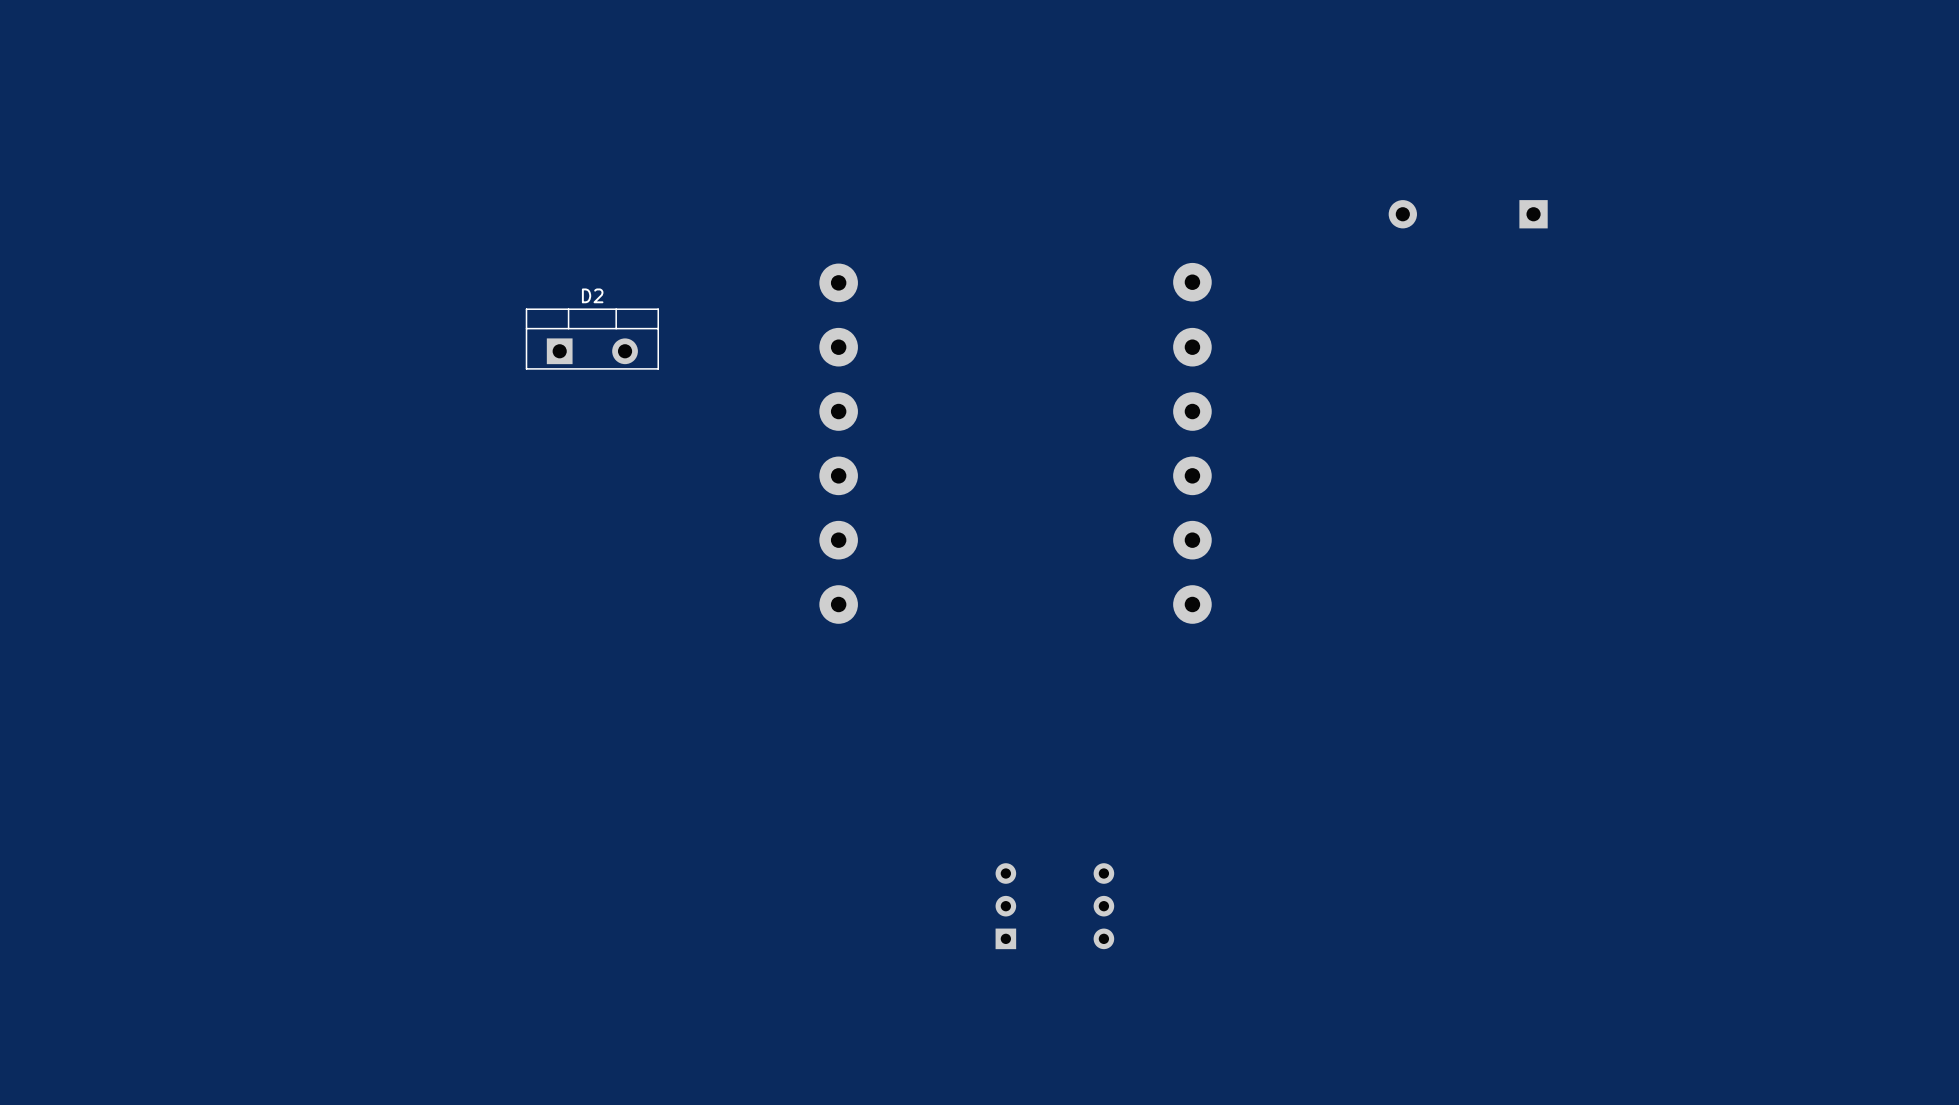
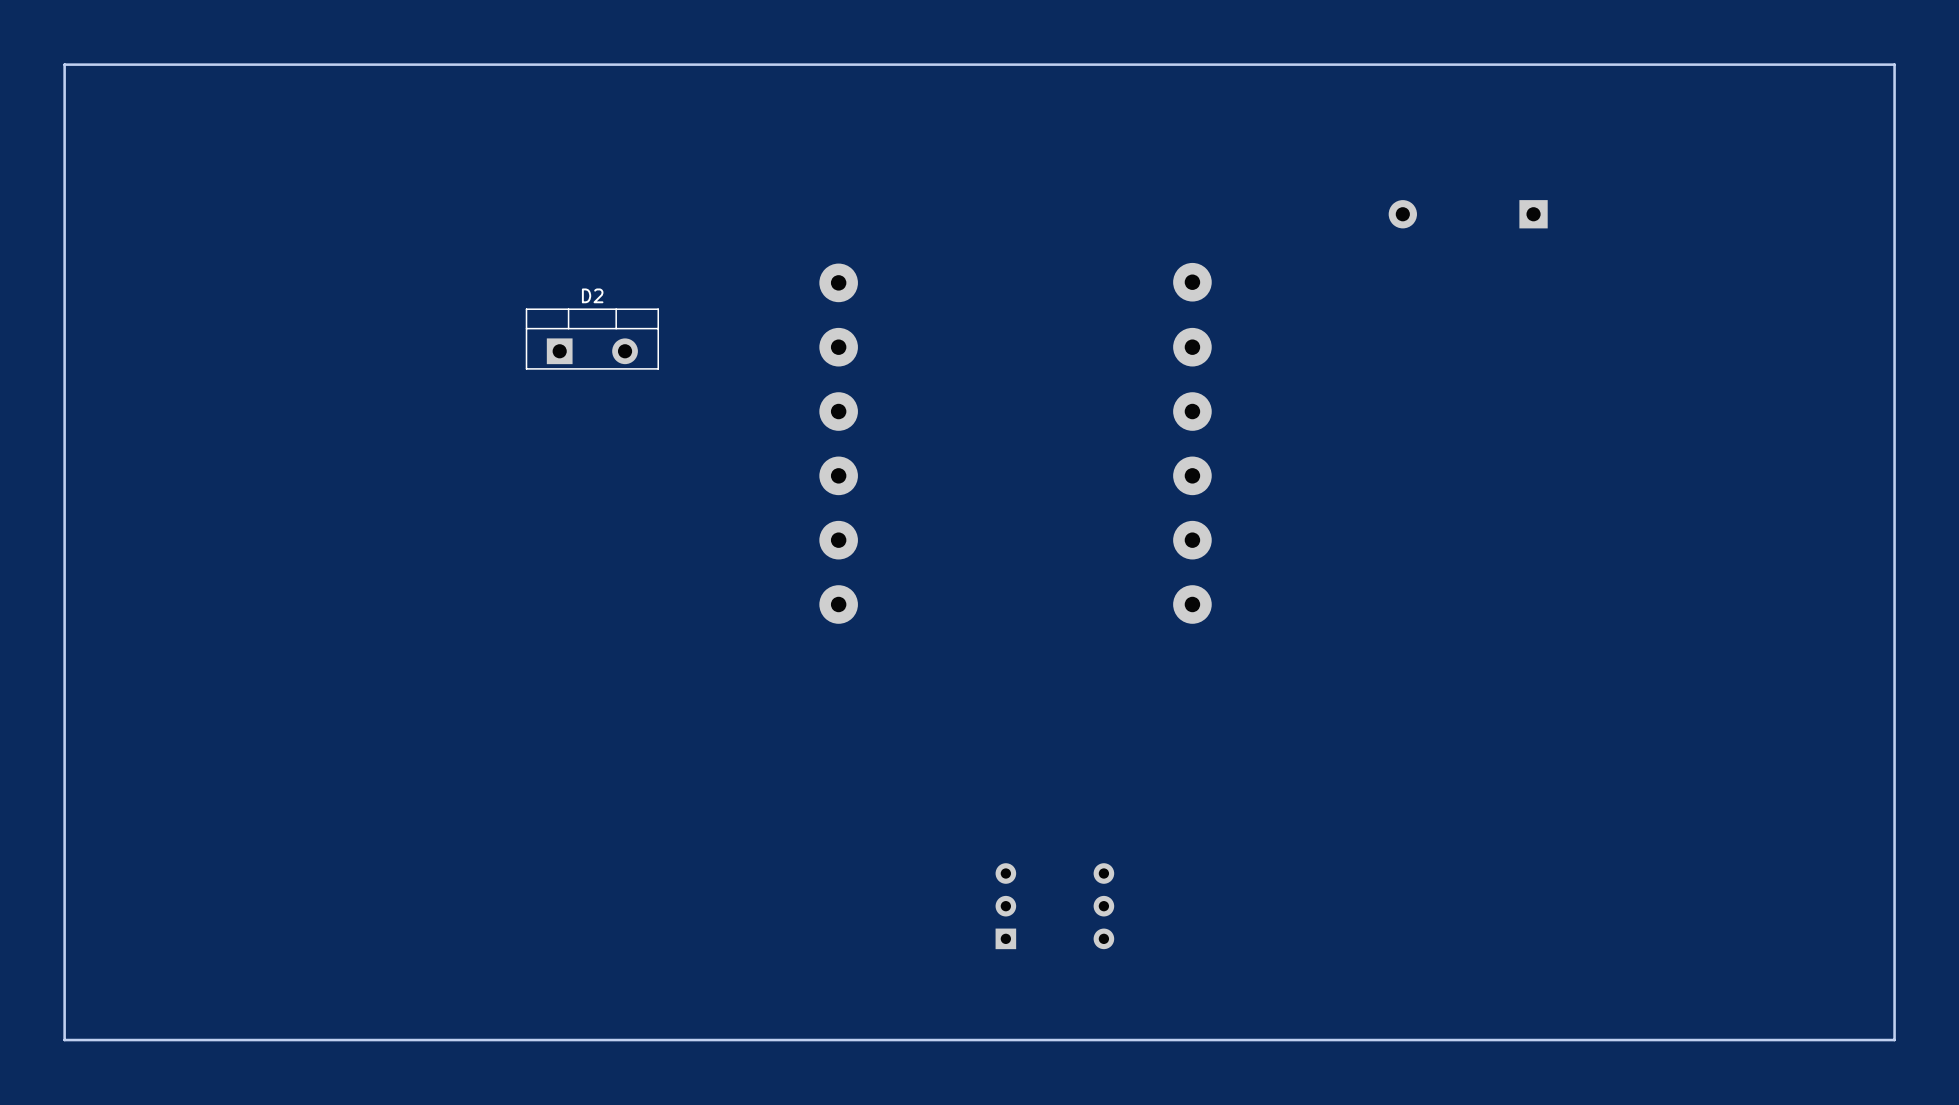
board edge: none -> (1894, 64) (1894, 1040) (64, 1040) (64, 64) (1894, 64)

